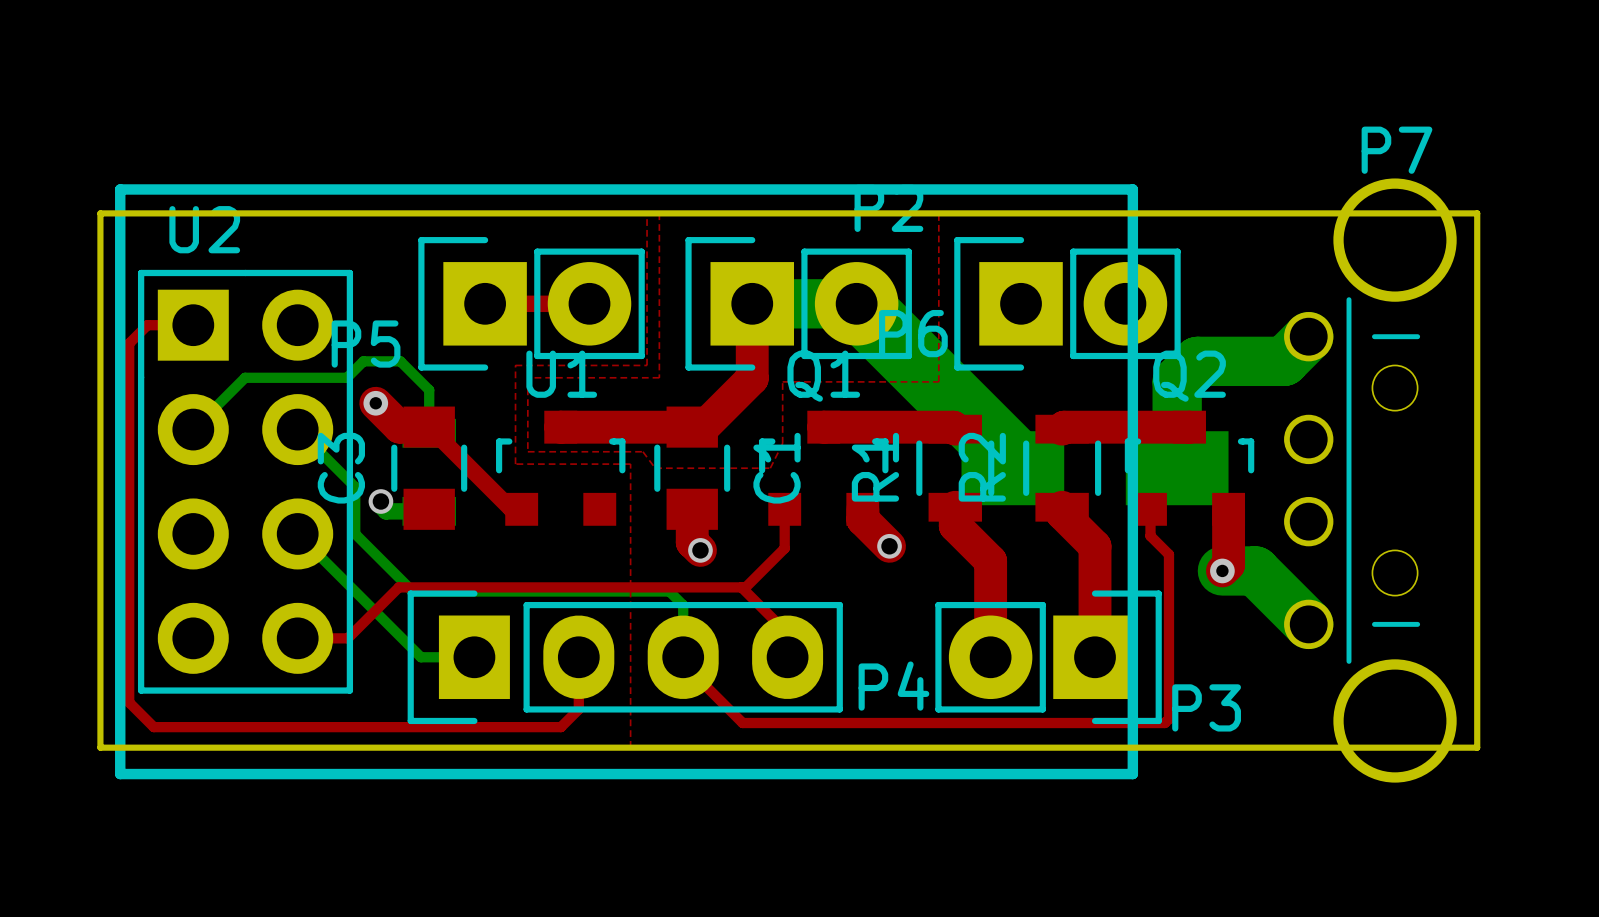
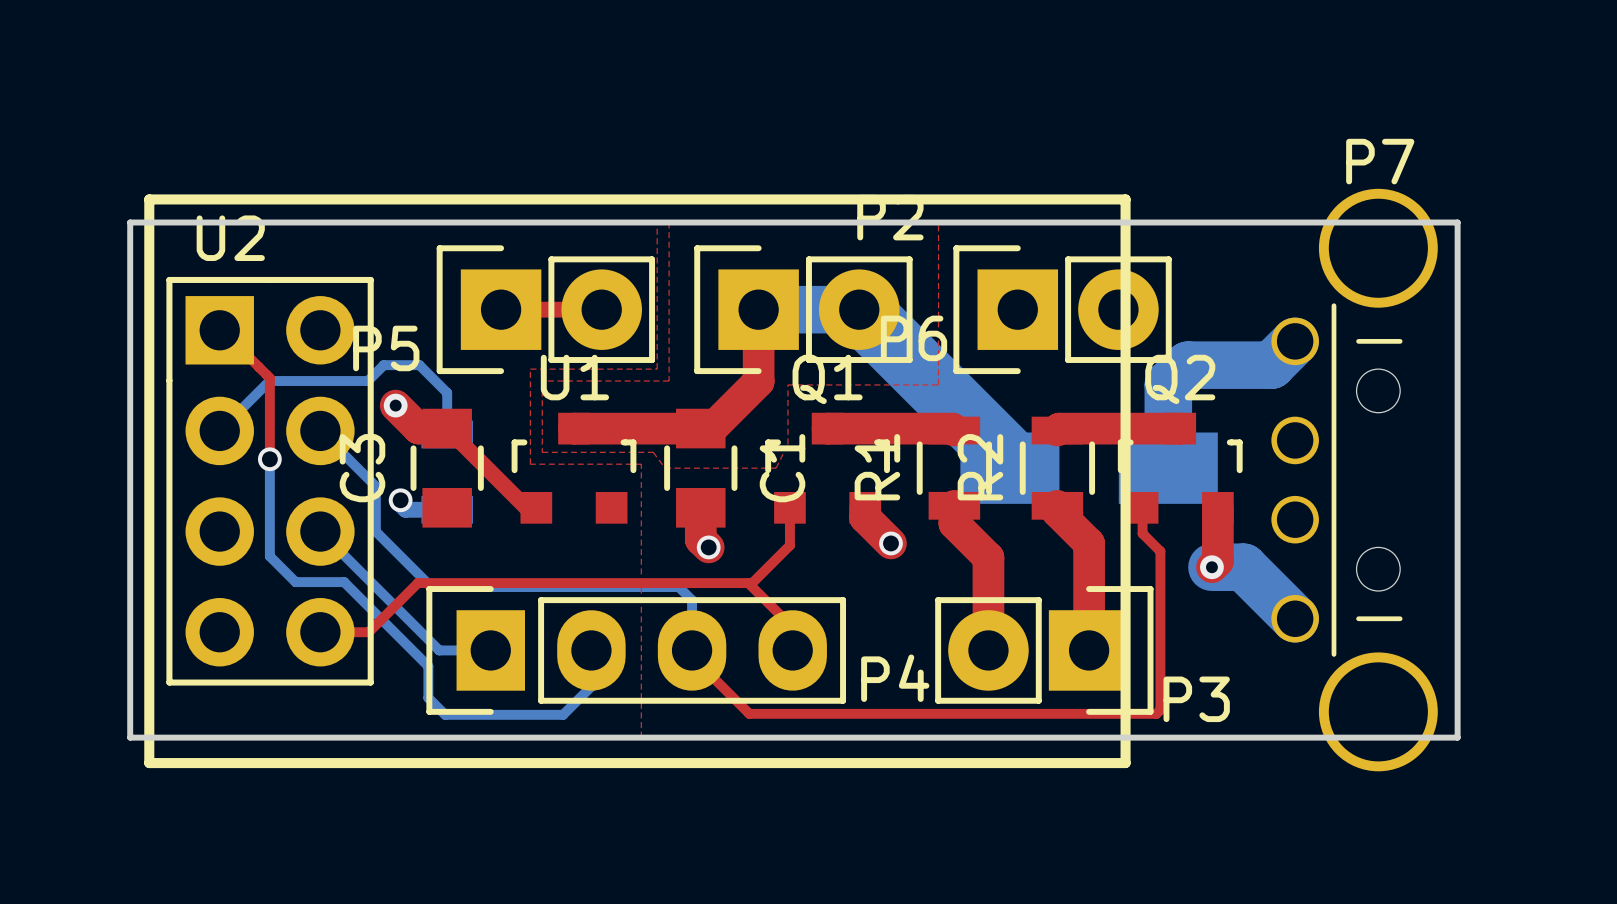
top track: (193, 325) (147, 325) (129, 343) (129, 702) (153, 727) (560, 727) (578, 709) (578, 657) -> (219, 330) (222, 330) (269, 378) (269, 459)
bottom track: none -> (269, 459) (269, 556) (295, 582) (344, 582) (428, 666) (428, 698) (445, 714) (563, 714) (591, 686) (591, 650)
via: none -> (269, 459)

